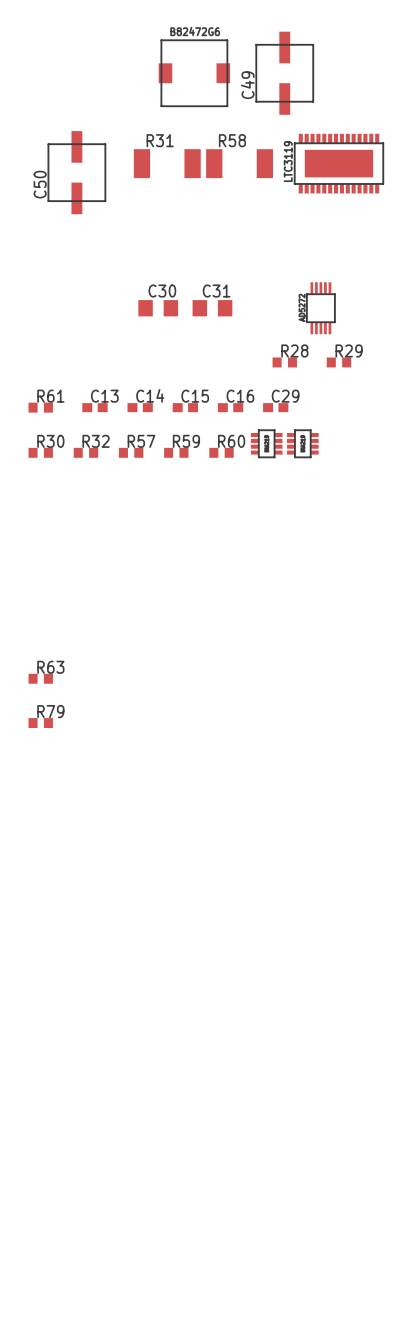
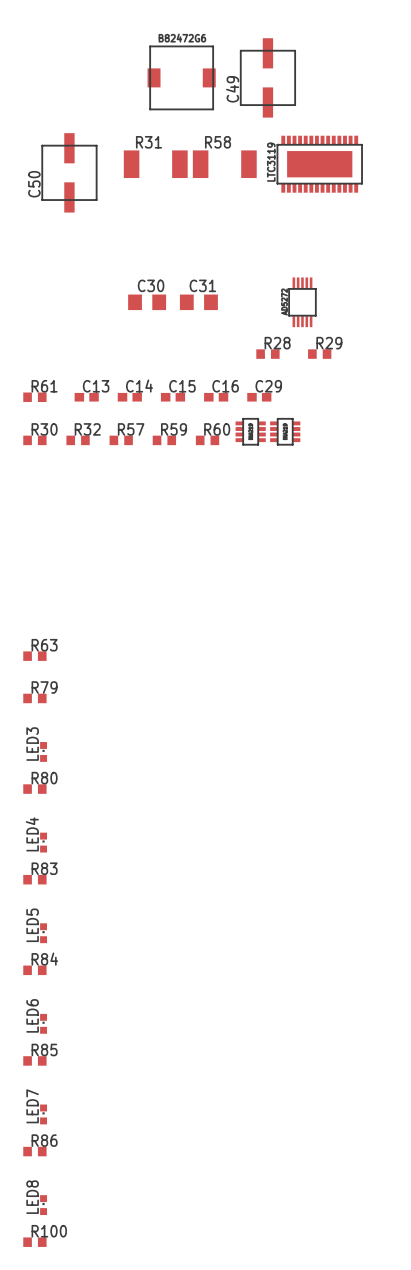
LED3: none -> (43, 751)
R80: none -> (34, 789)
LED4: none -> (43, 842)
R83: none -> (34, 879)
LED5: none -> (43, 933)
R84: none -> (34, 970)
LED6: none -> (43, 1023)
R85: none -> (34, 1060)
LED7: none -> (43, 1114)
R86: none -> (34, 1151)
LED8: none -> (43, 1205)
R100: none -> (34, 1242)

